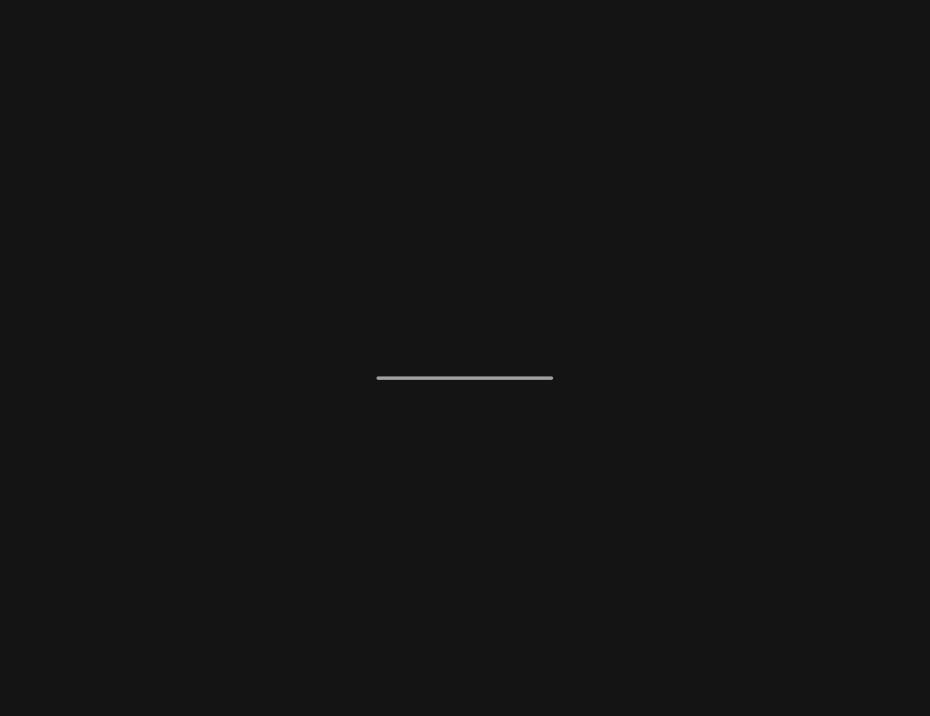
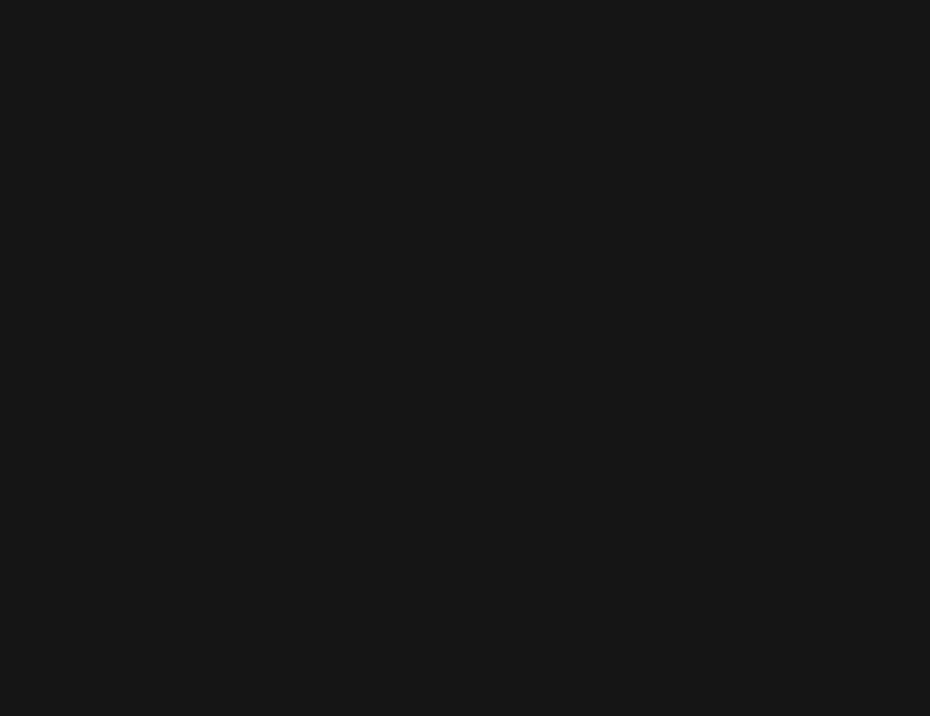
board edge: (551, 378) (378, 378) -> none

